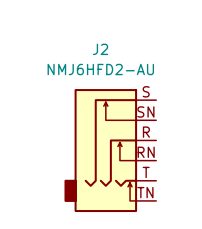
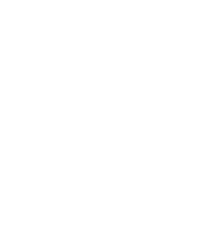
J2: NMJ6HFD2-AU (110, 150) -> none

